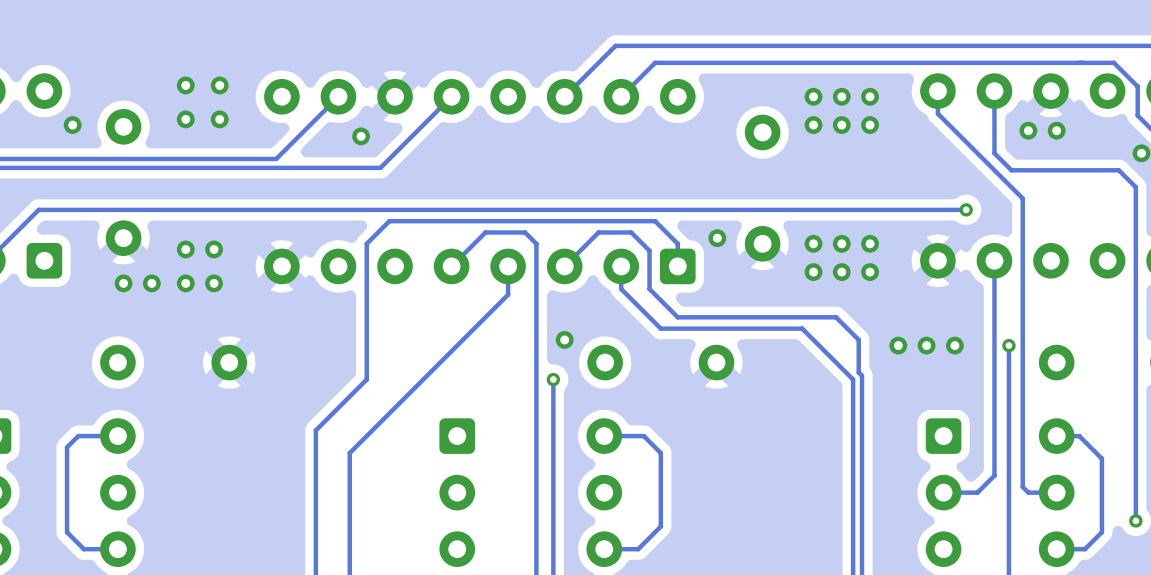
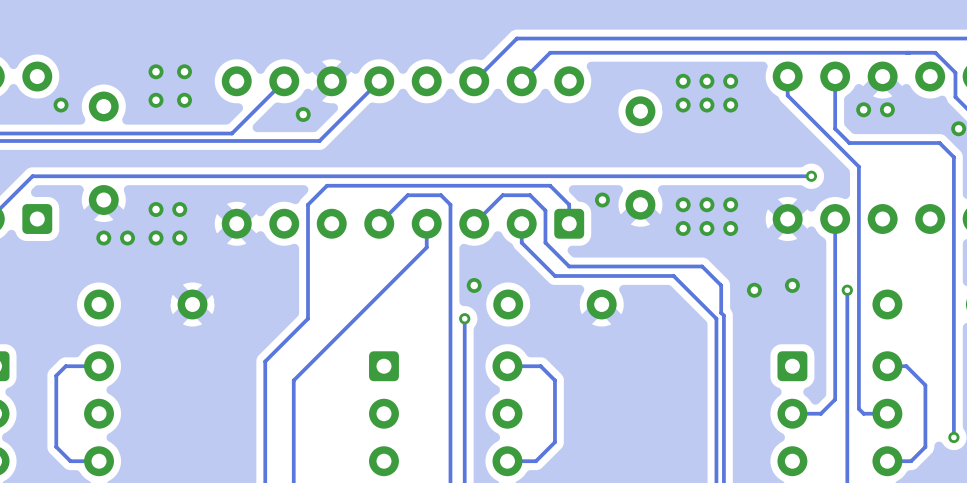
via: none -> (792, 285)
via: (926, 345) -> none
via: (954, 345) -> none

